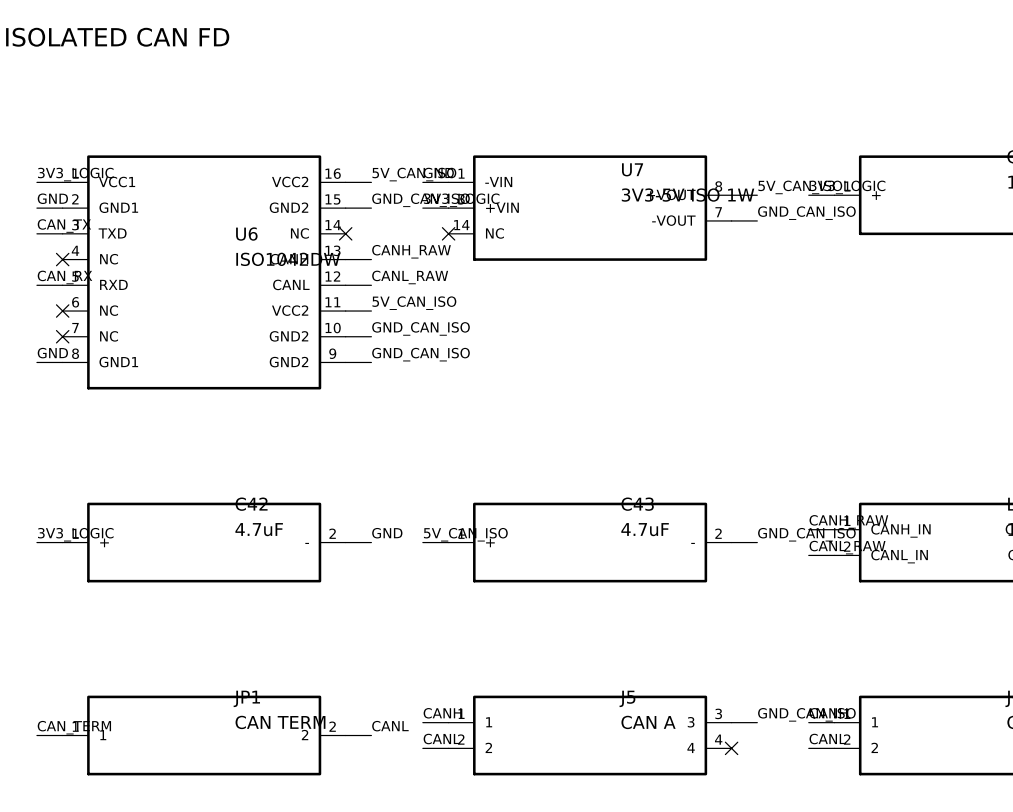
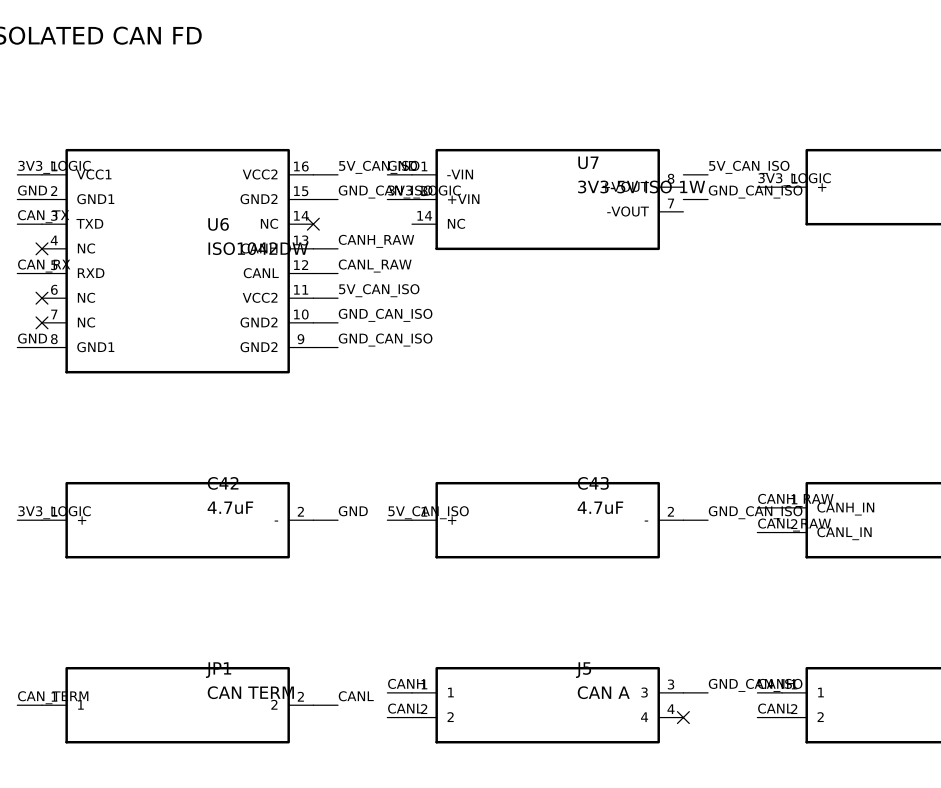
label position: 5V_CAN_ISO (800, 187) -> 5V_CAN_ISO (749, 167)
wire: (731, 195) (757, 195) -> (683, 174) (708, 174)
label position: GND_CAN_ISO (806, 213) -> GND_CAN_ISO (755, 192)
wire: (731, 220) (757, 220) -> (683, 199) (708, 199)
no-connect mark: (448, 233) -> none

